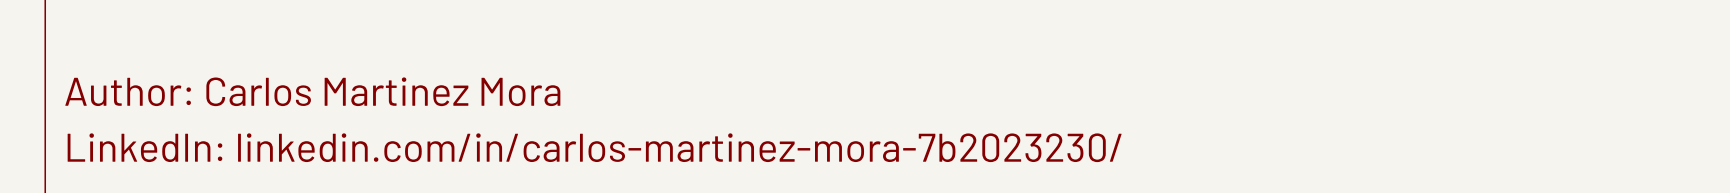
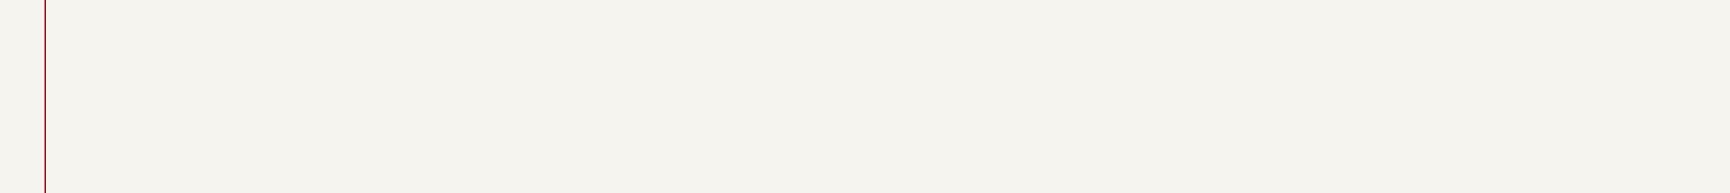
title block: Author: Carlos Martinez Mora (312, 91) -> none
title block: LinkedIn: linkedin.com/in/carlos-martinez-mora-7b2023230/ (594, 147) -> none

